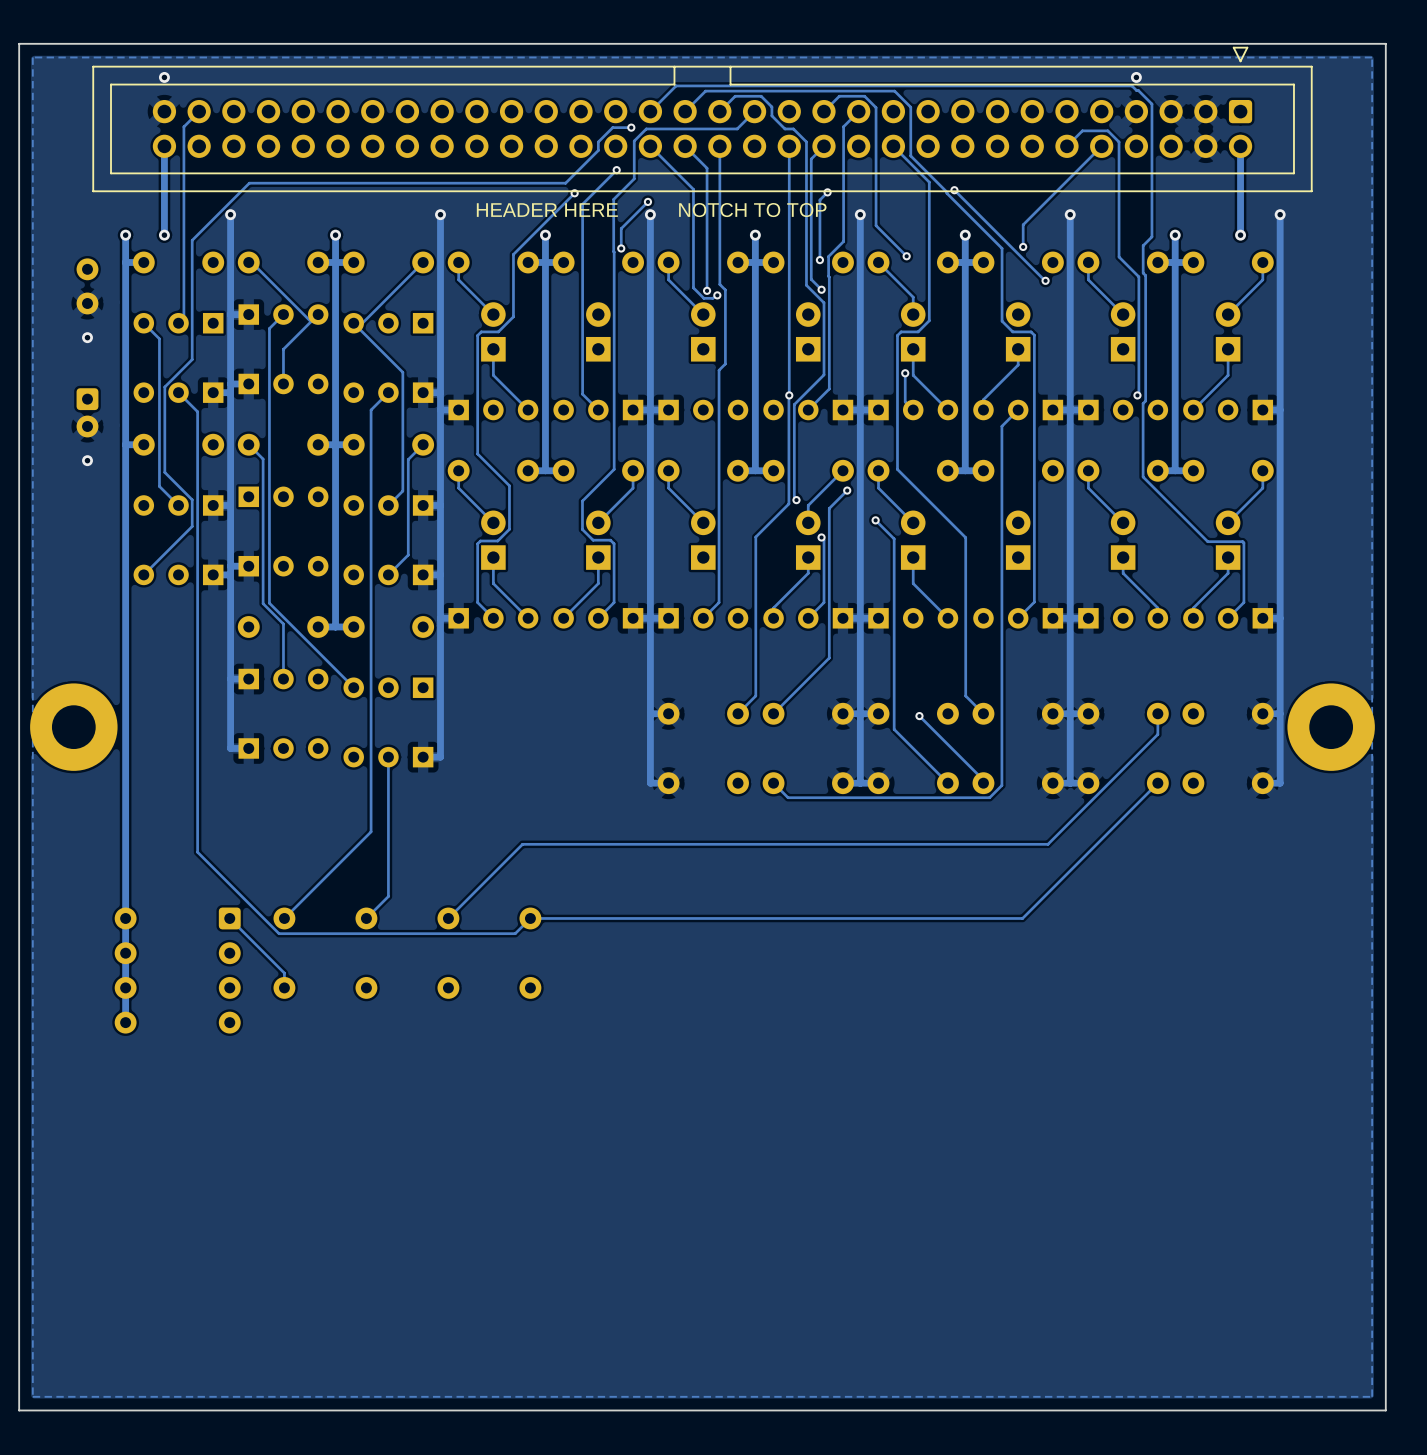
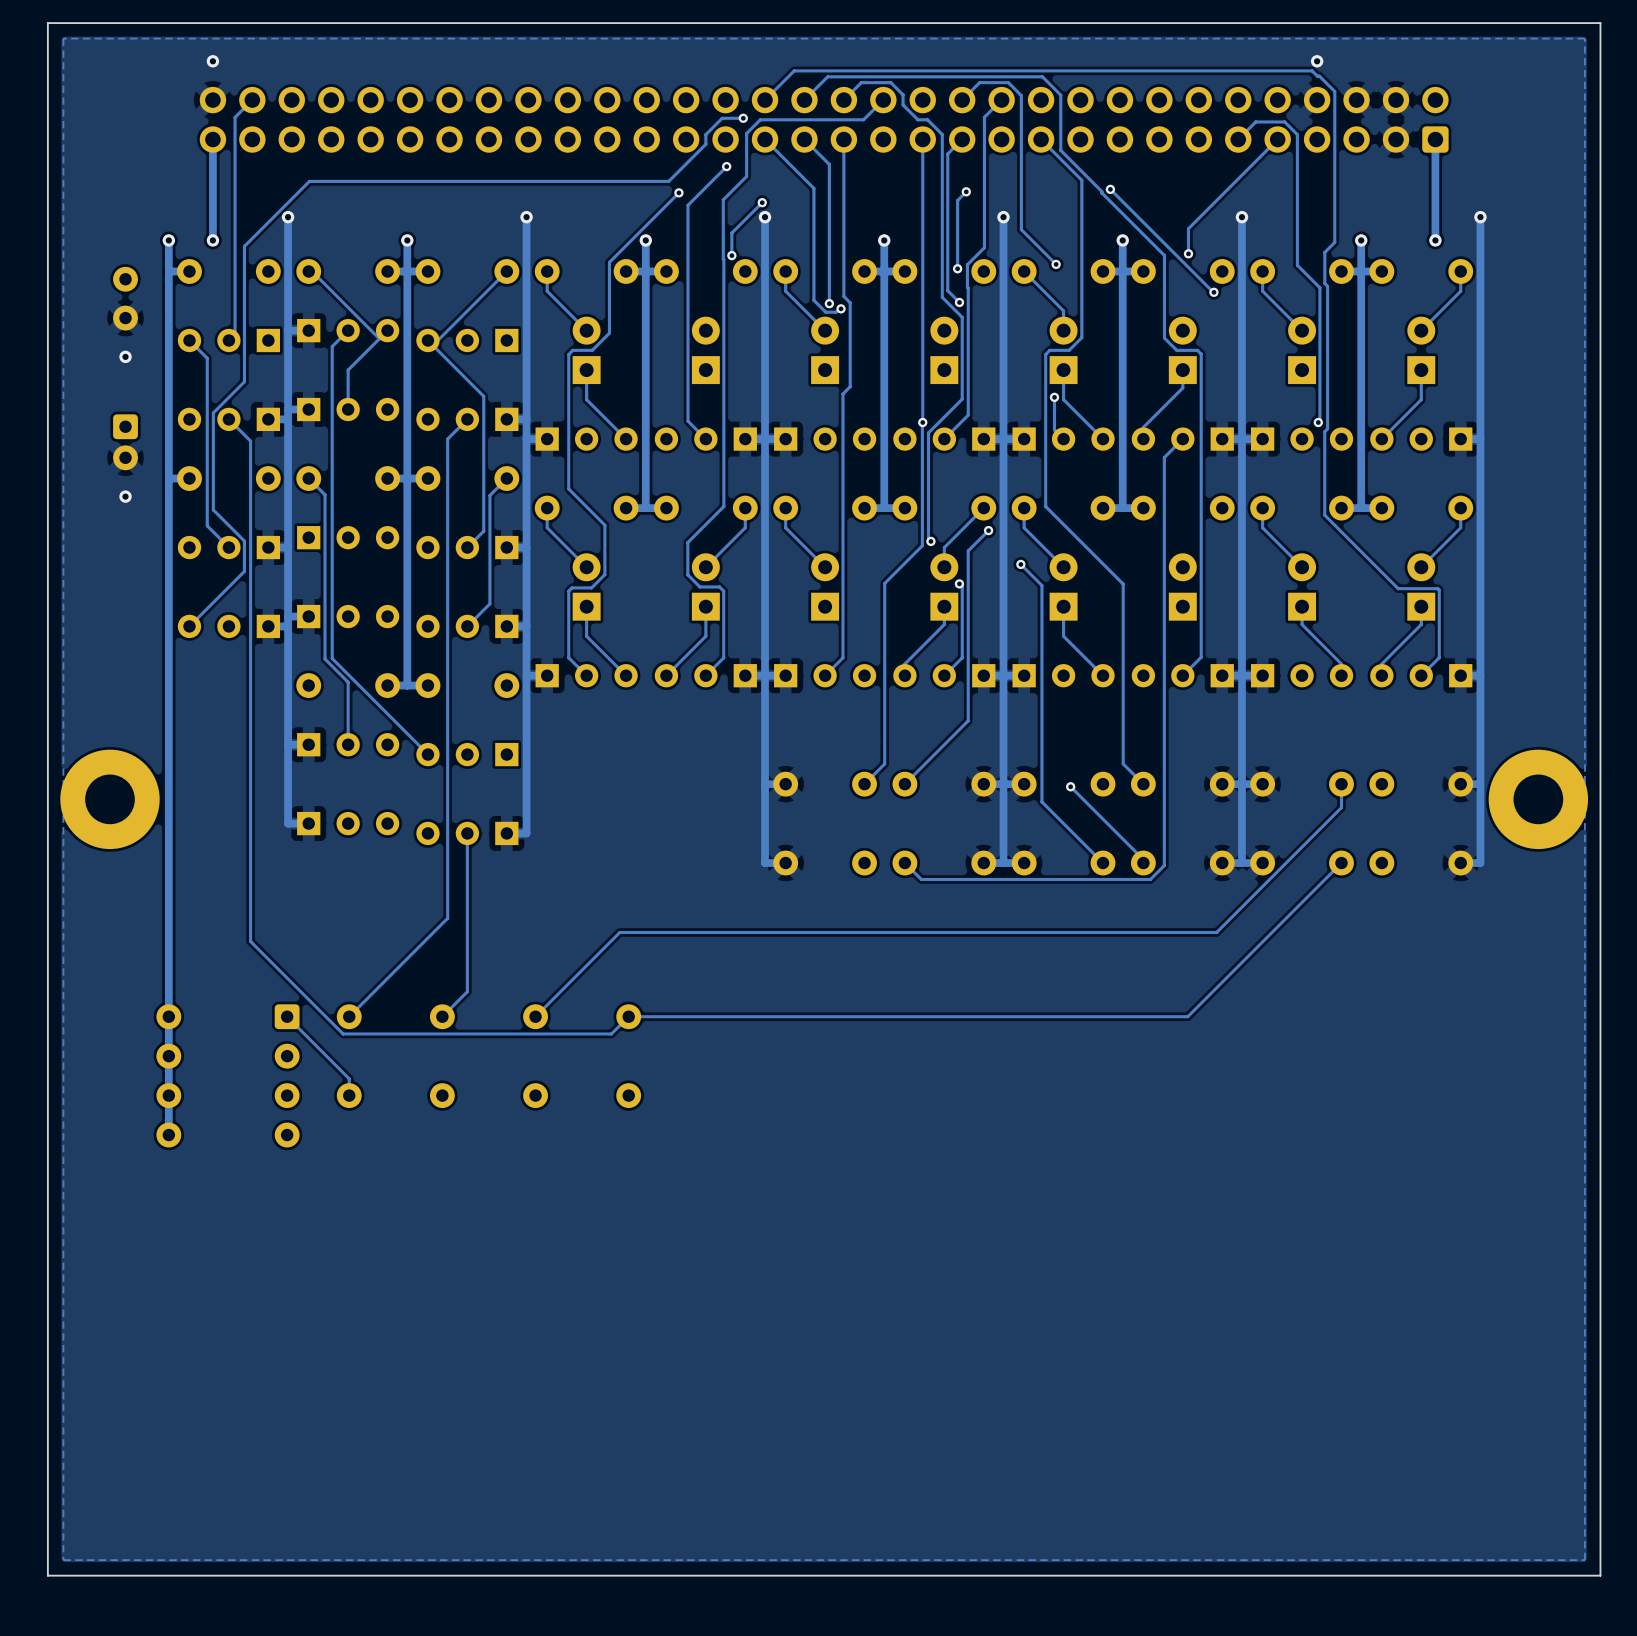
part side: bottom (702, 119) -> top (824, 119)
text: HEADER HERE (547, 210) -> none
text: NOTCH TO TOP (752, 210) -> none

